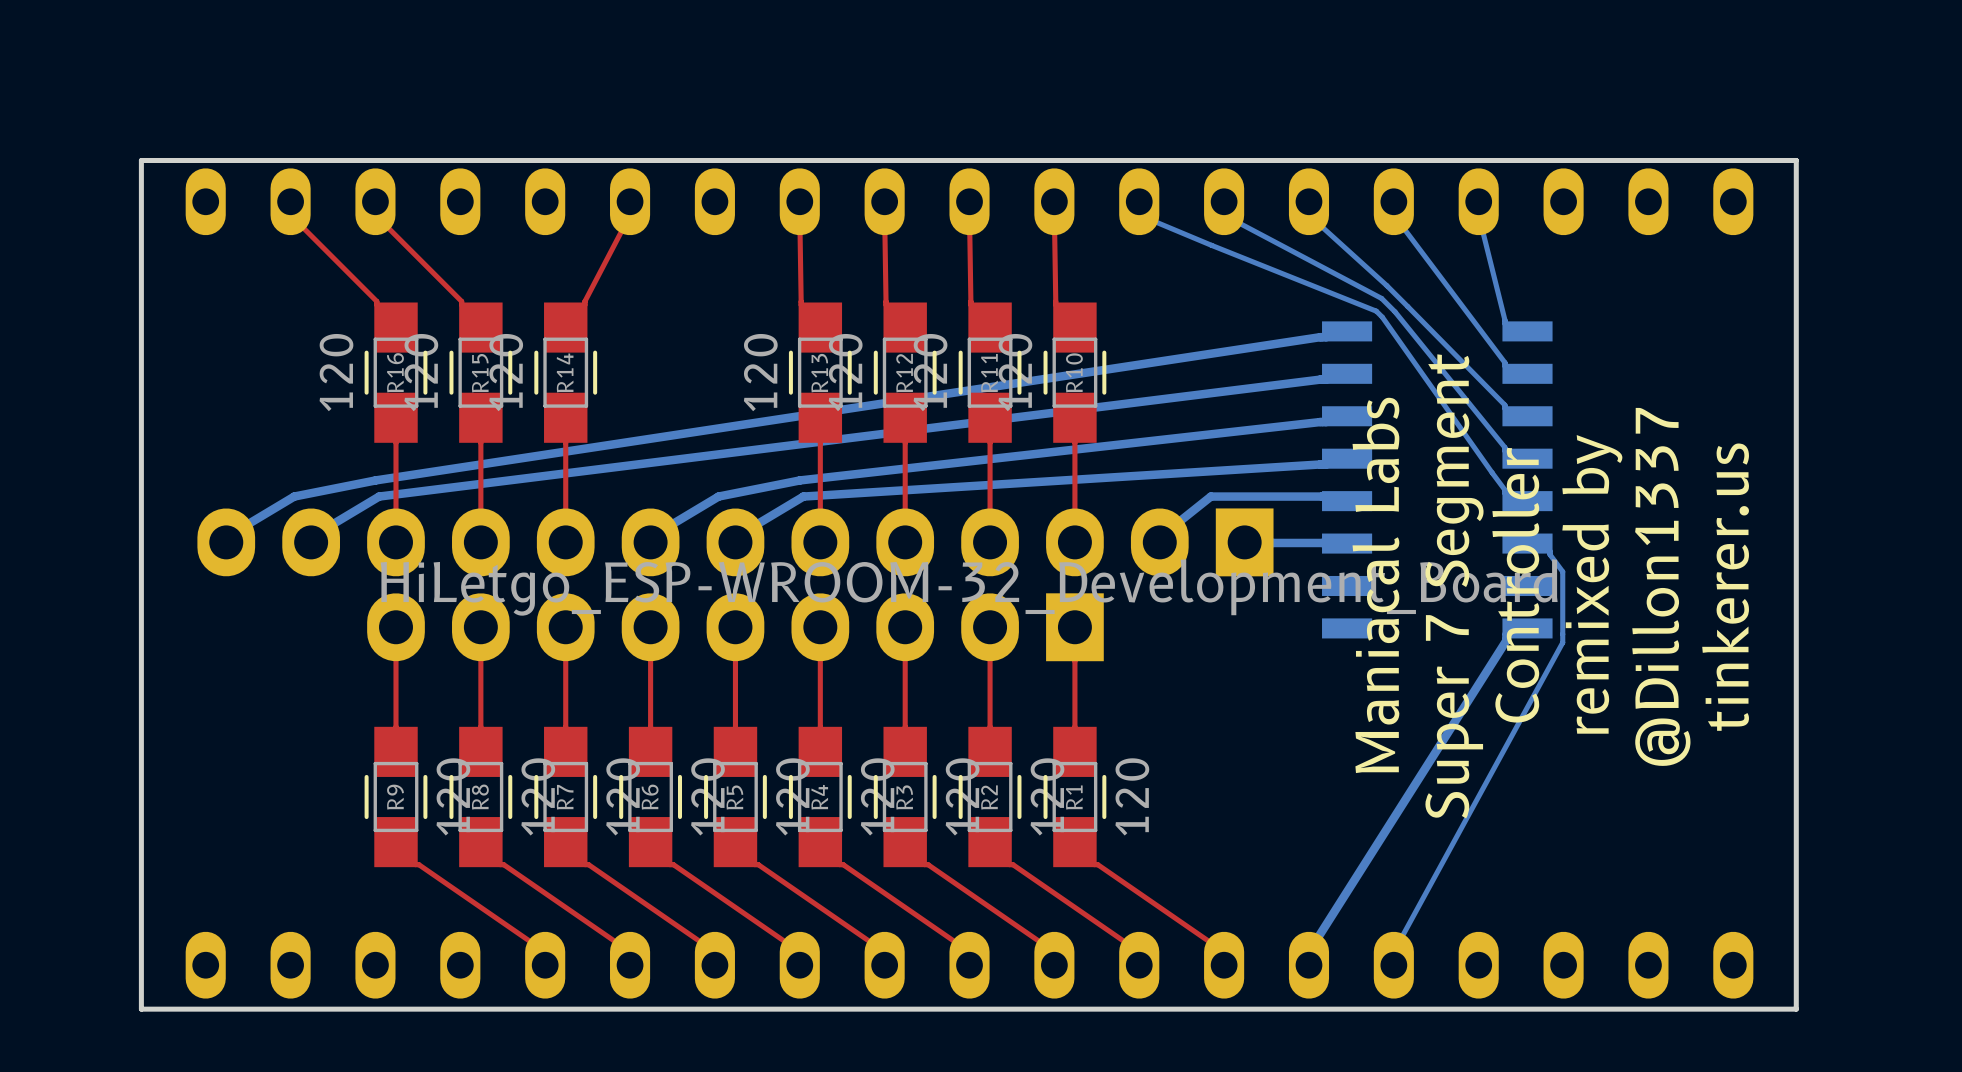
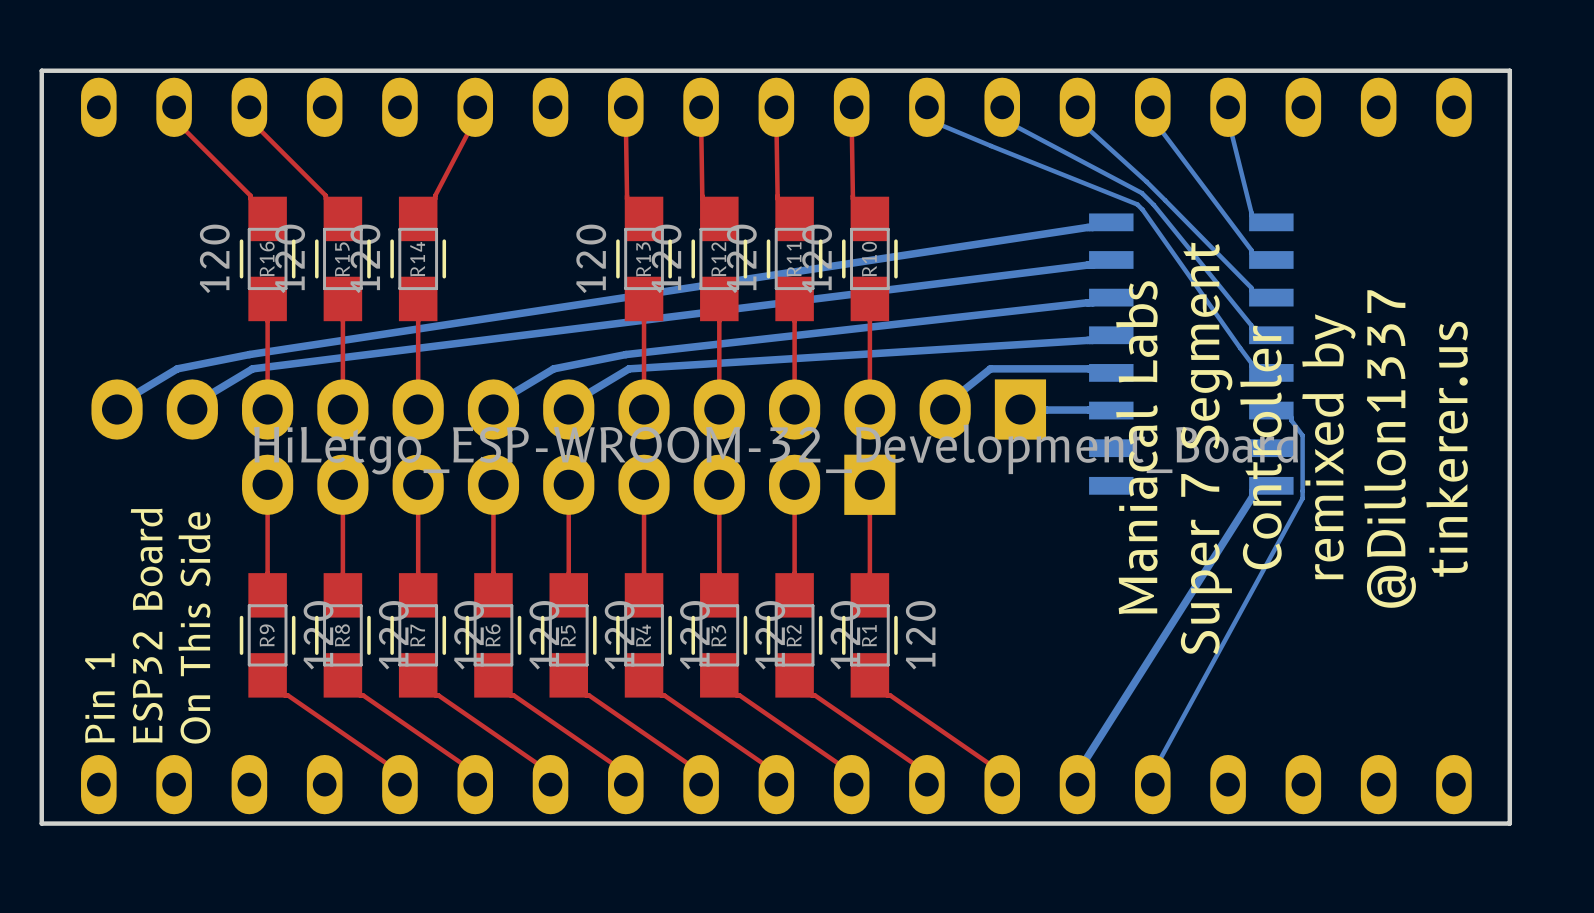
text: none -> ESP32 Board (146, 625)
text: none -> On This Side (194, 627)
text: none -> Pin 1 (99, 698)

